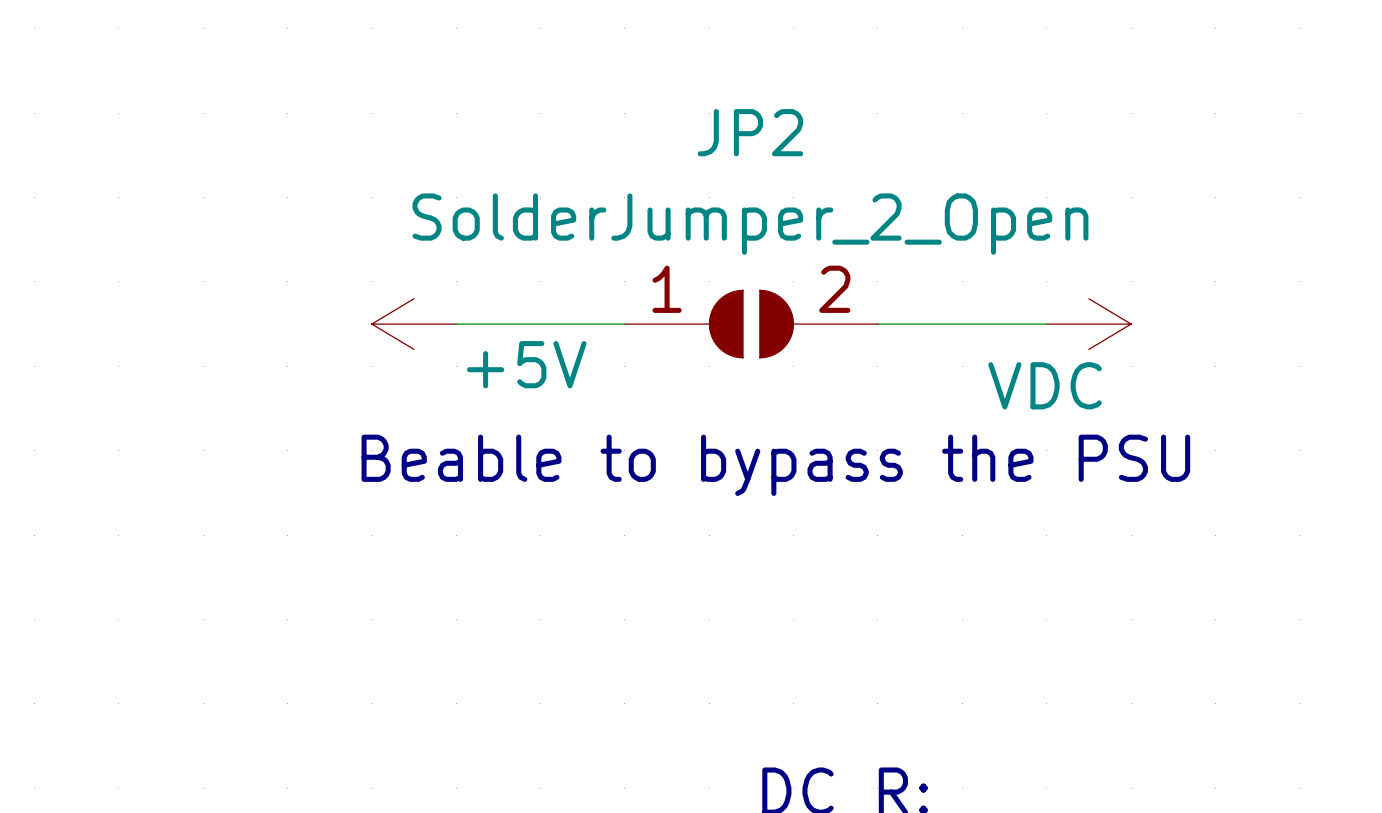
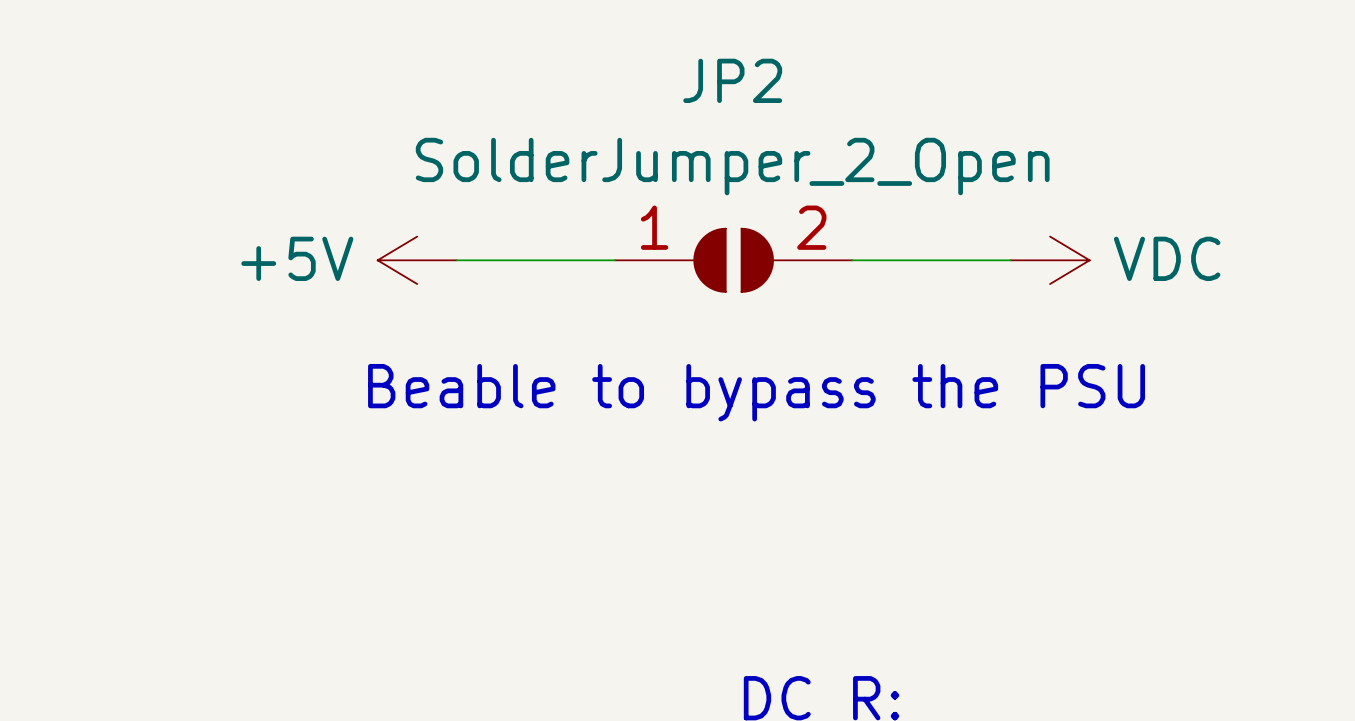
power symbol text position: +5V (526, 364) -> +5V (297, 258)
power symbol text position: VDC (1045, 385) -> VDC (1167, 258)

